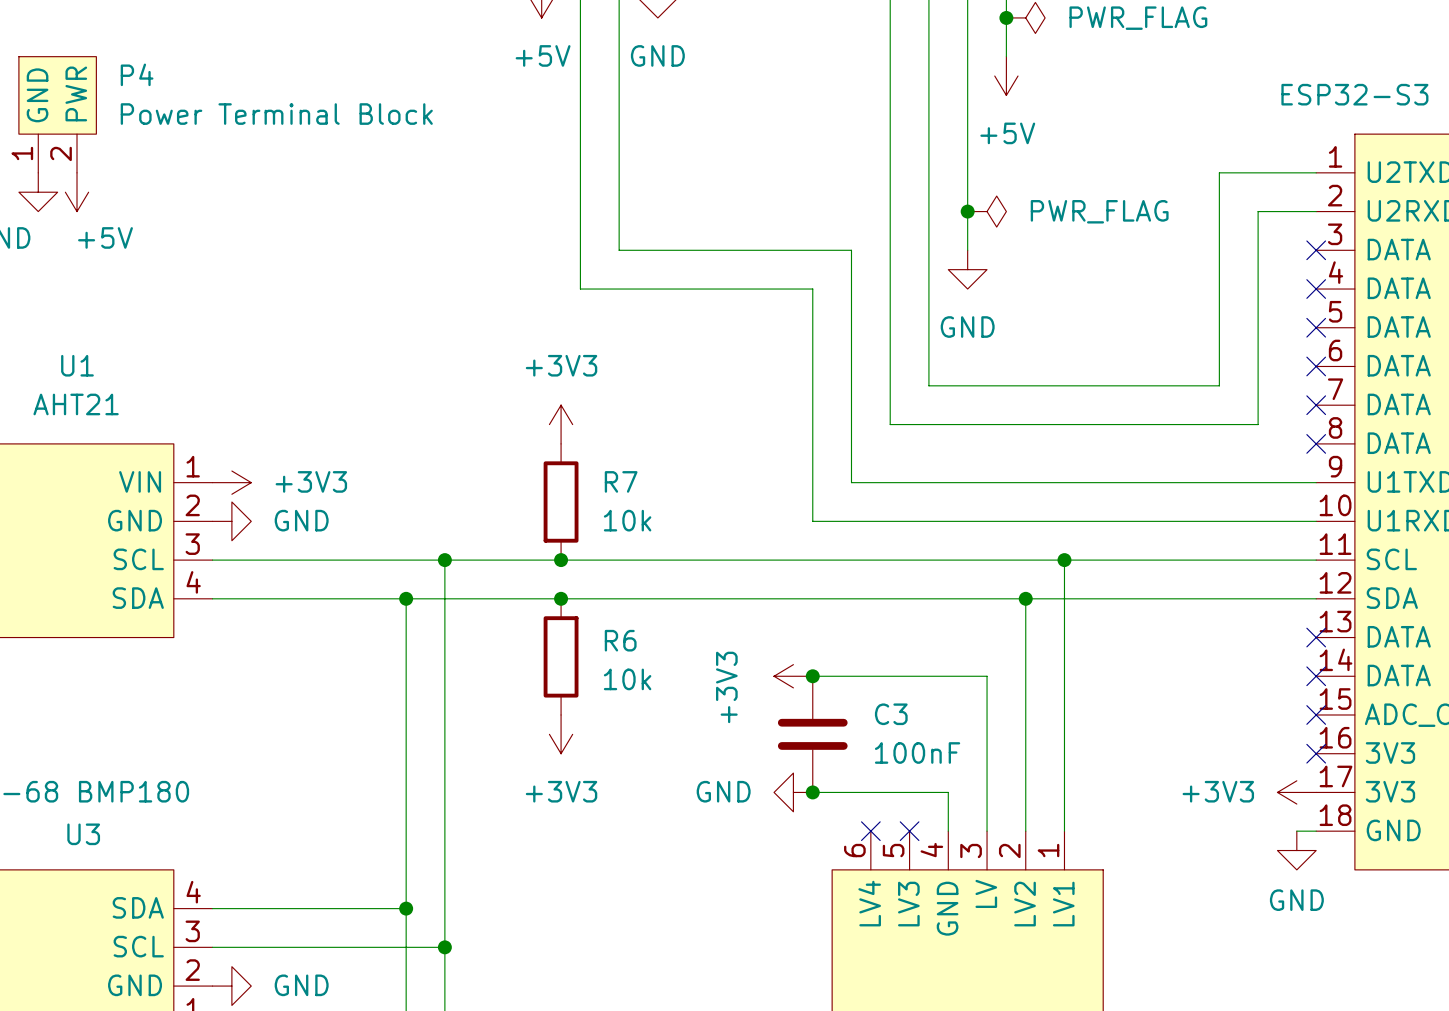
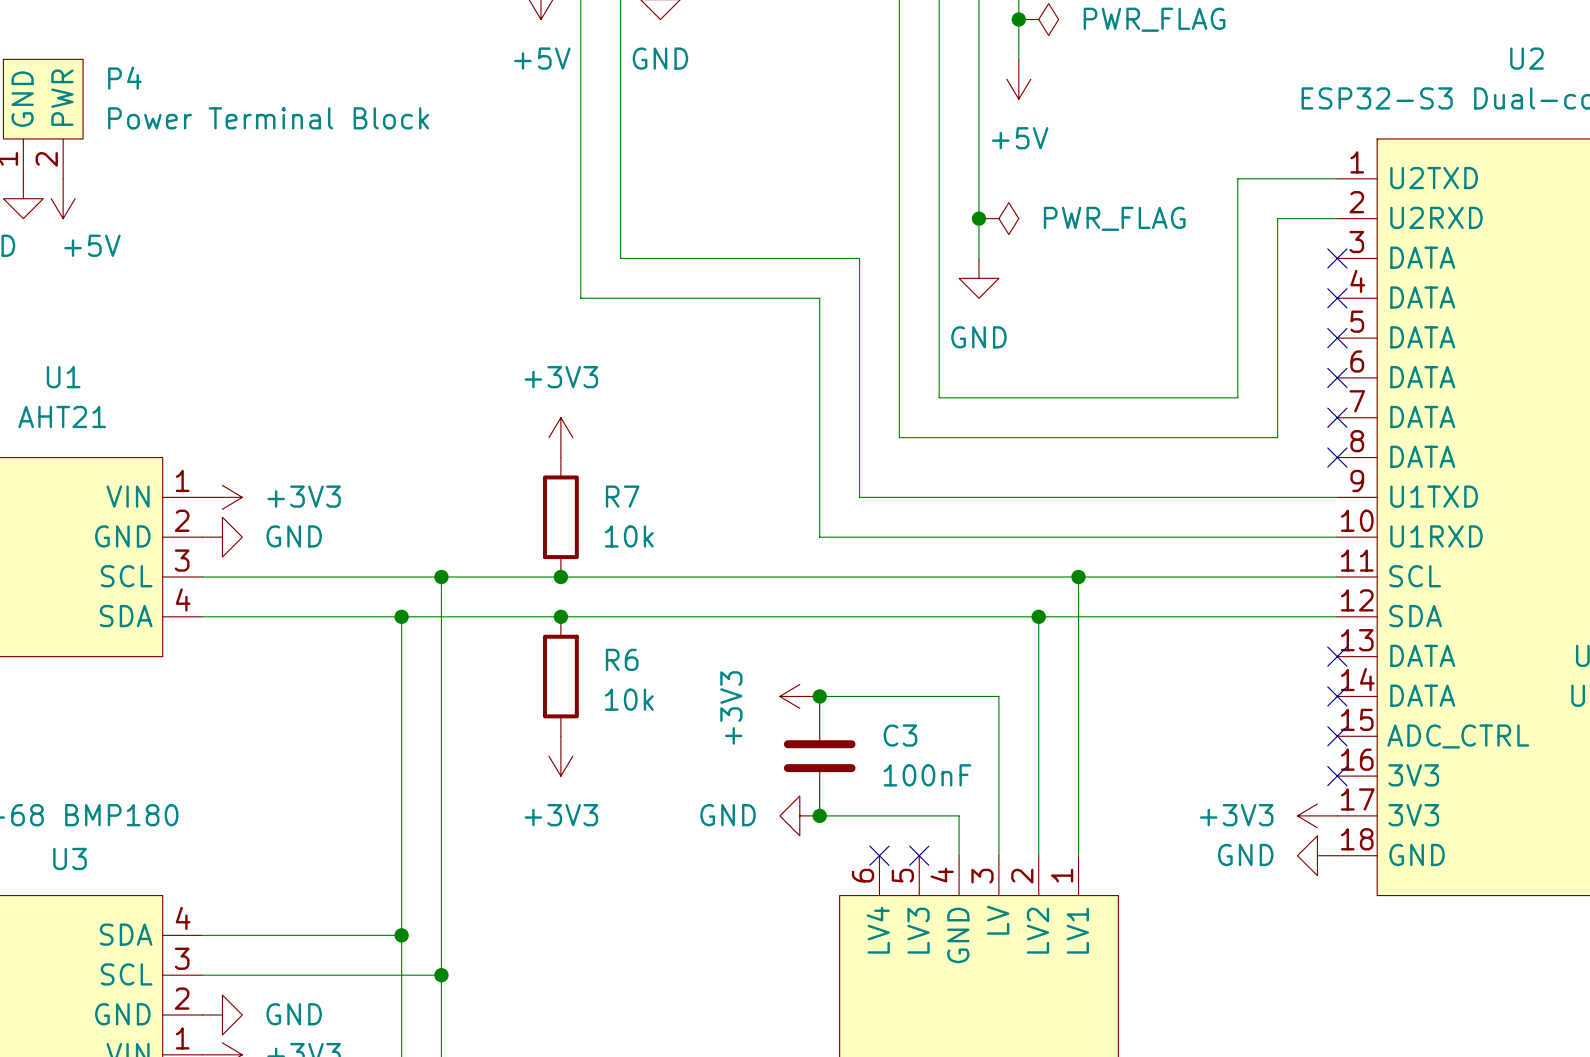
power symbol rotation: 0° (1296, 850) -> 90° clockwise (1317, 855)

